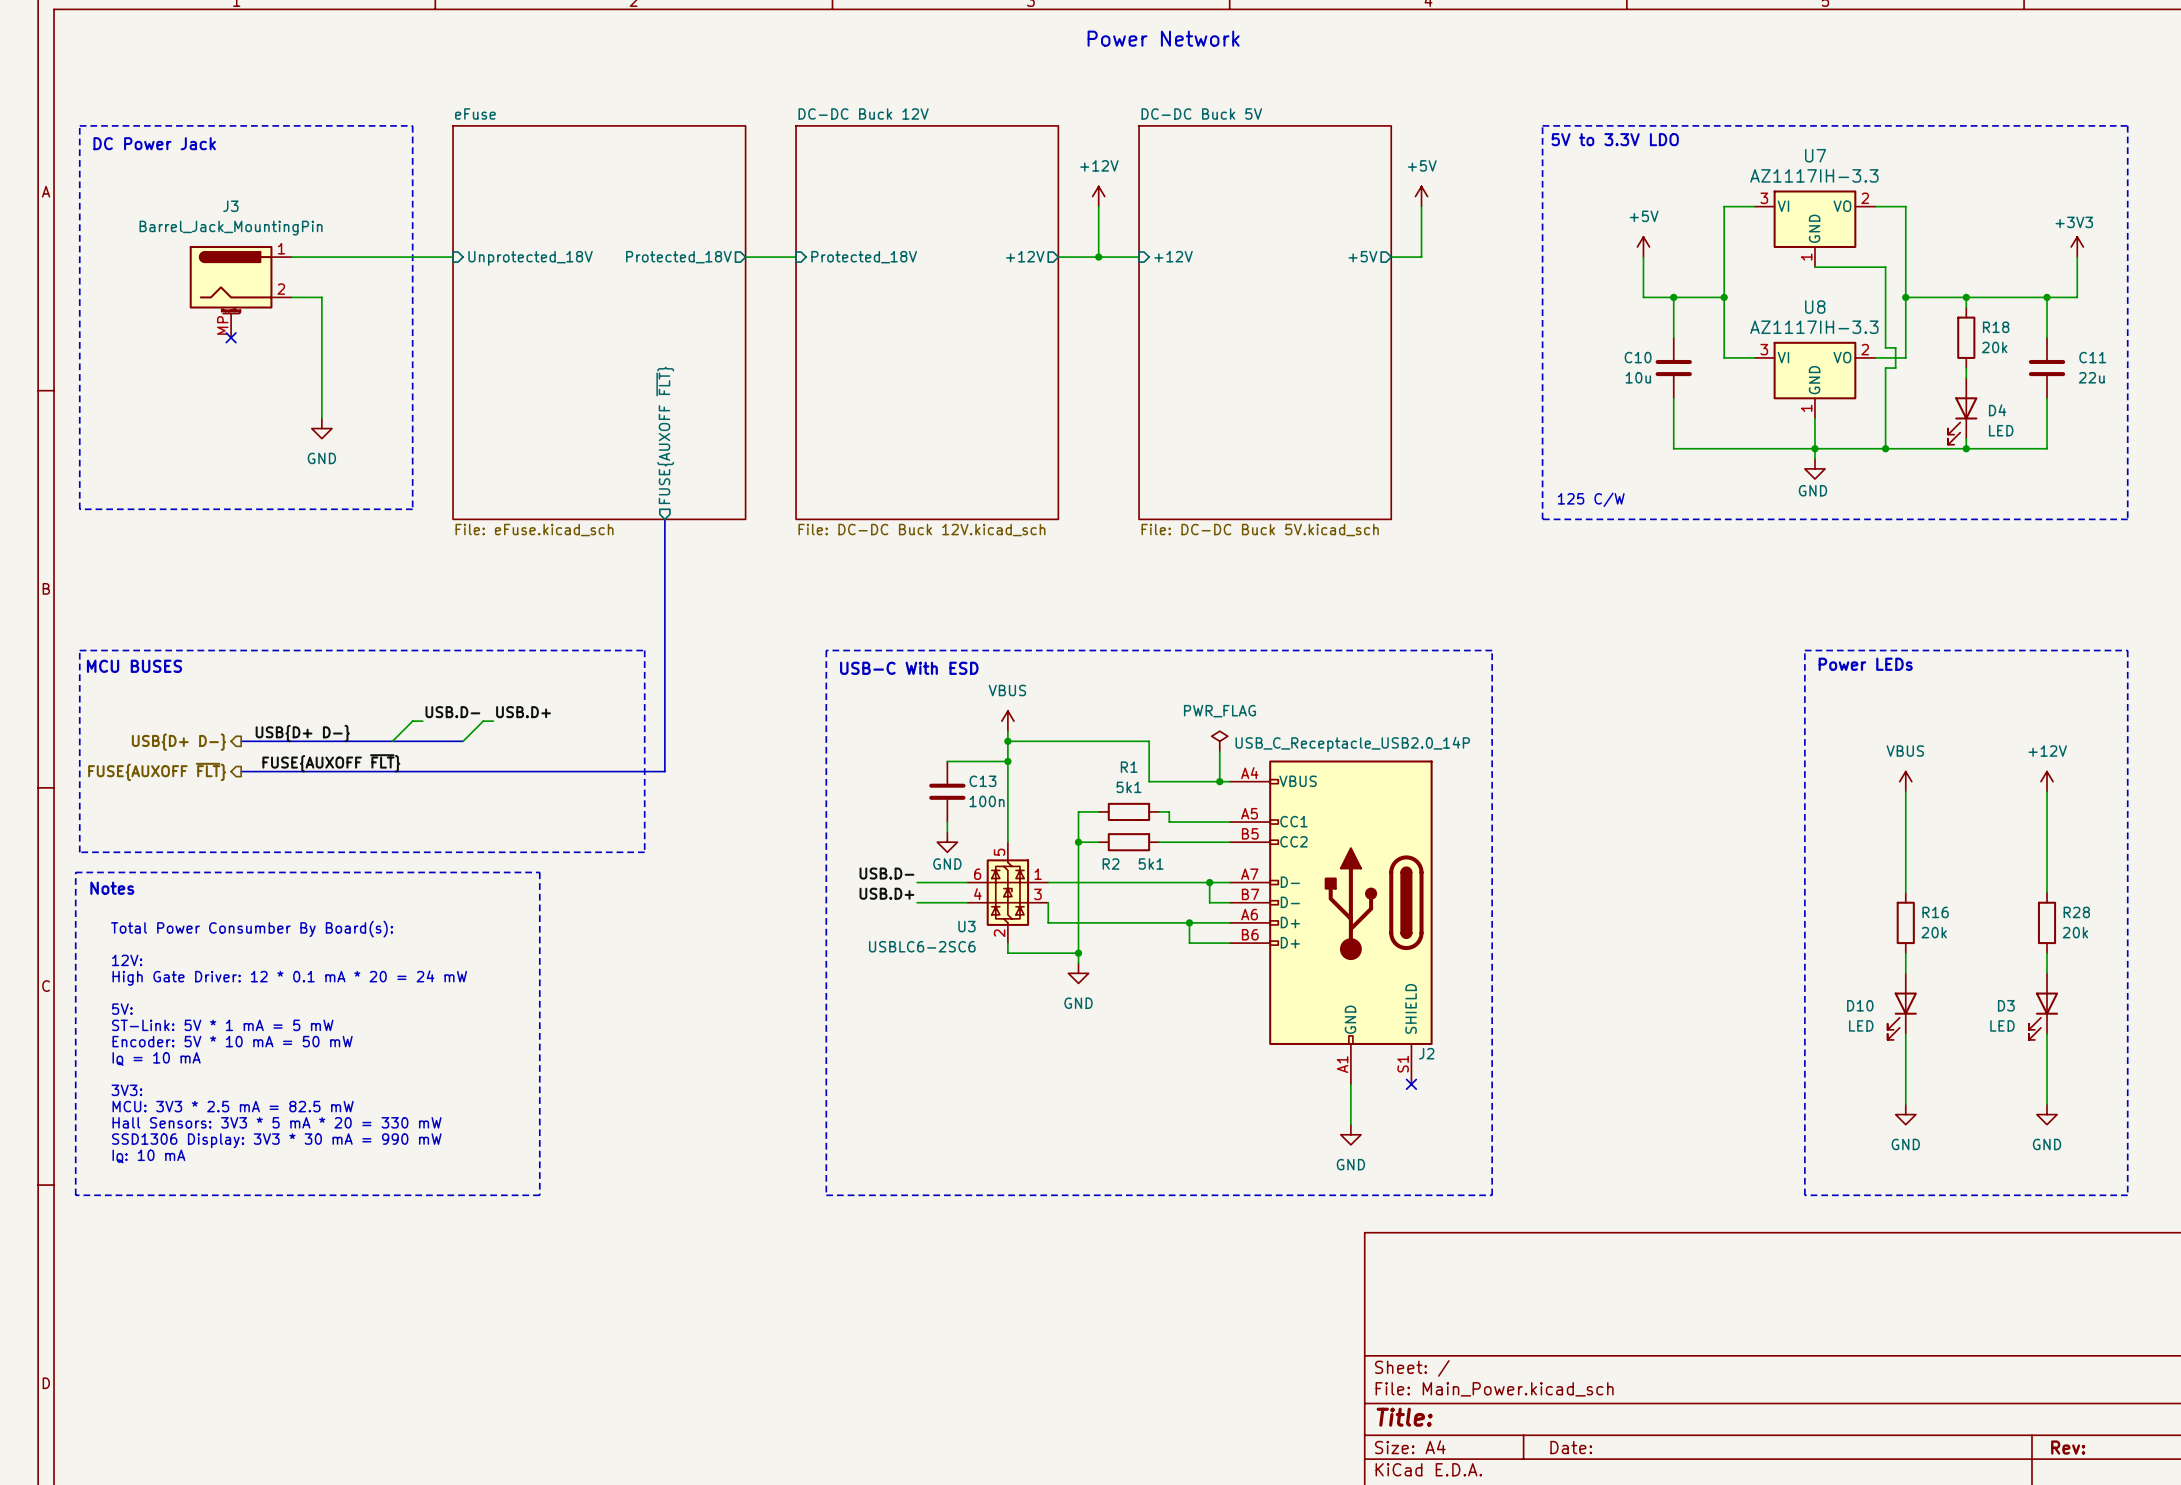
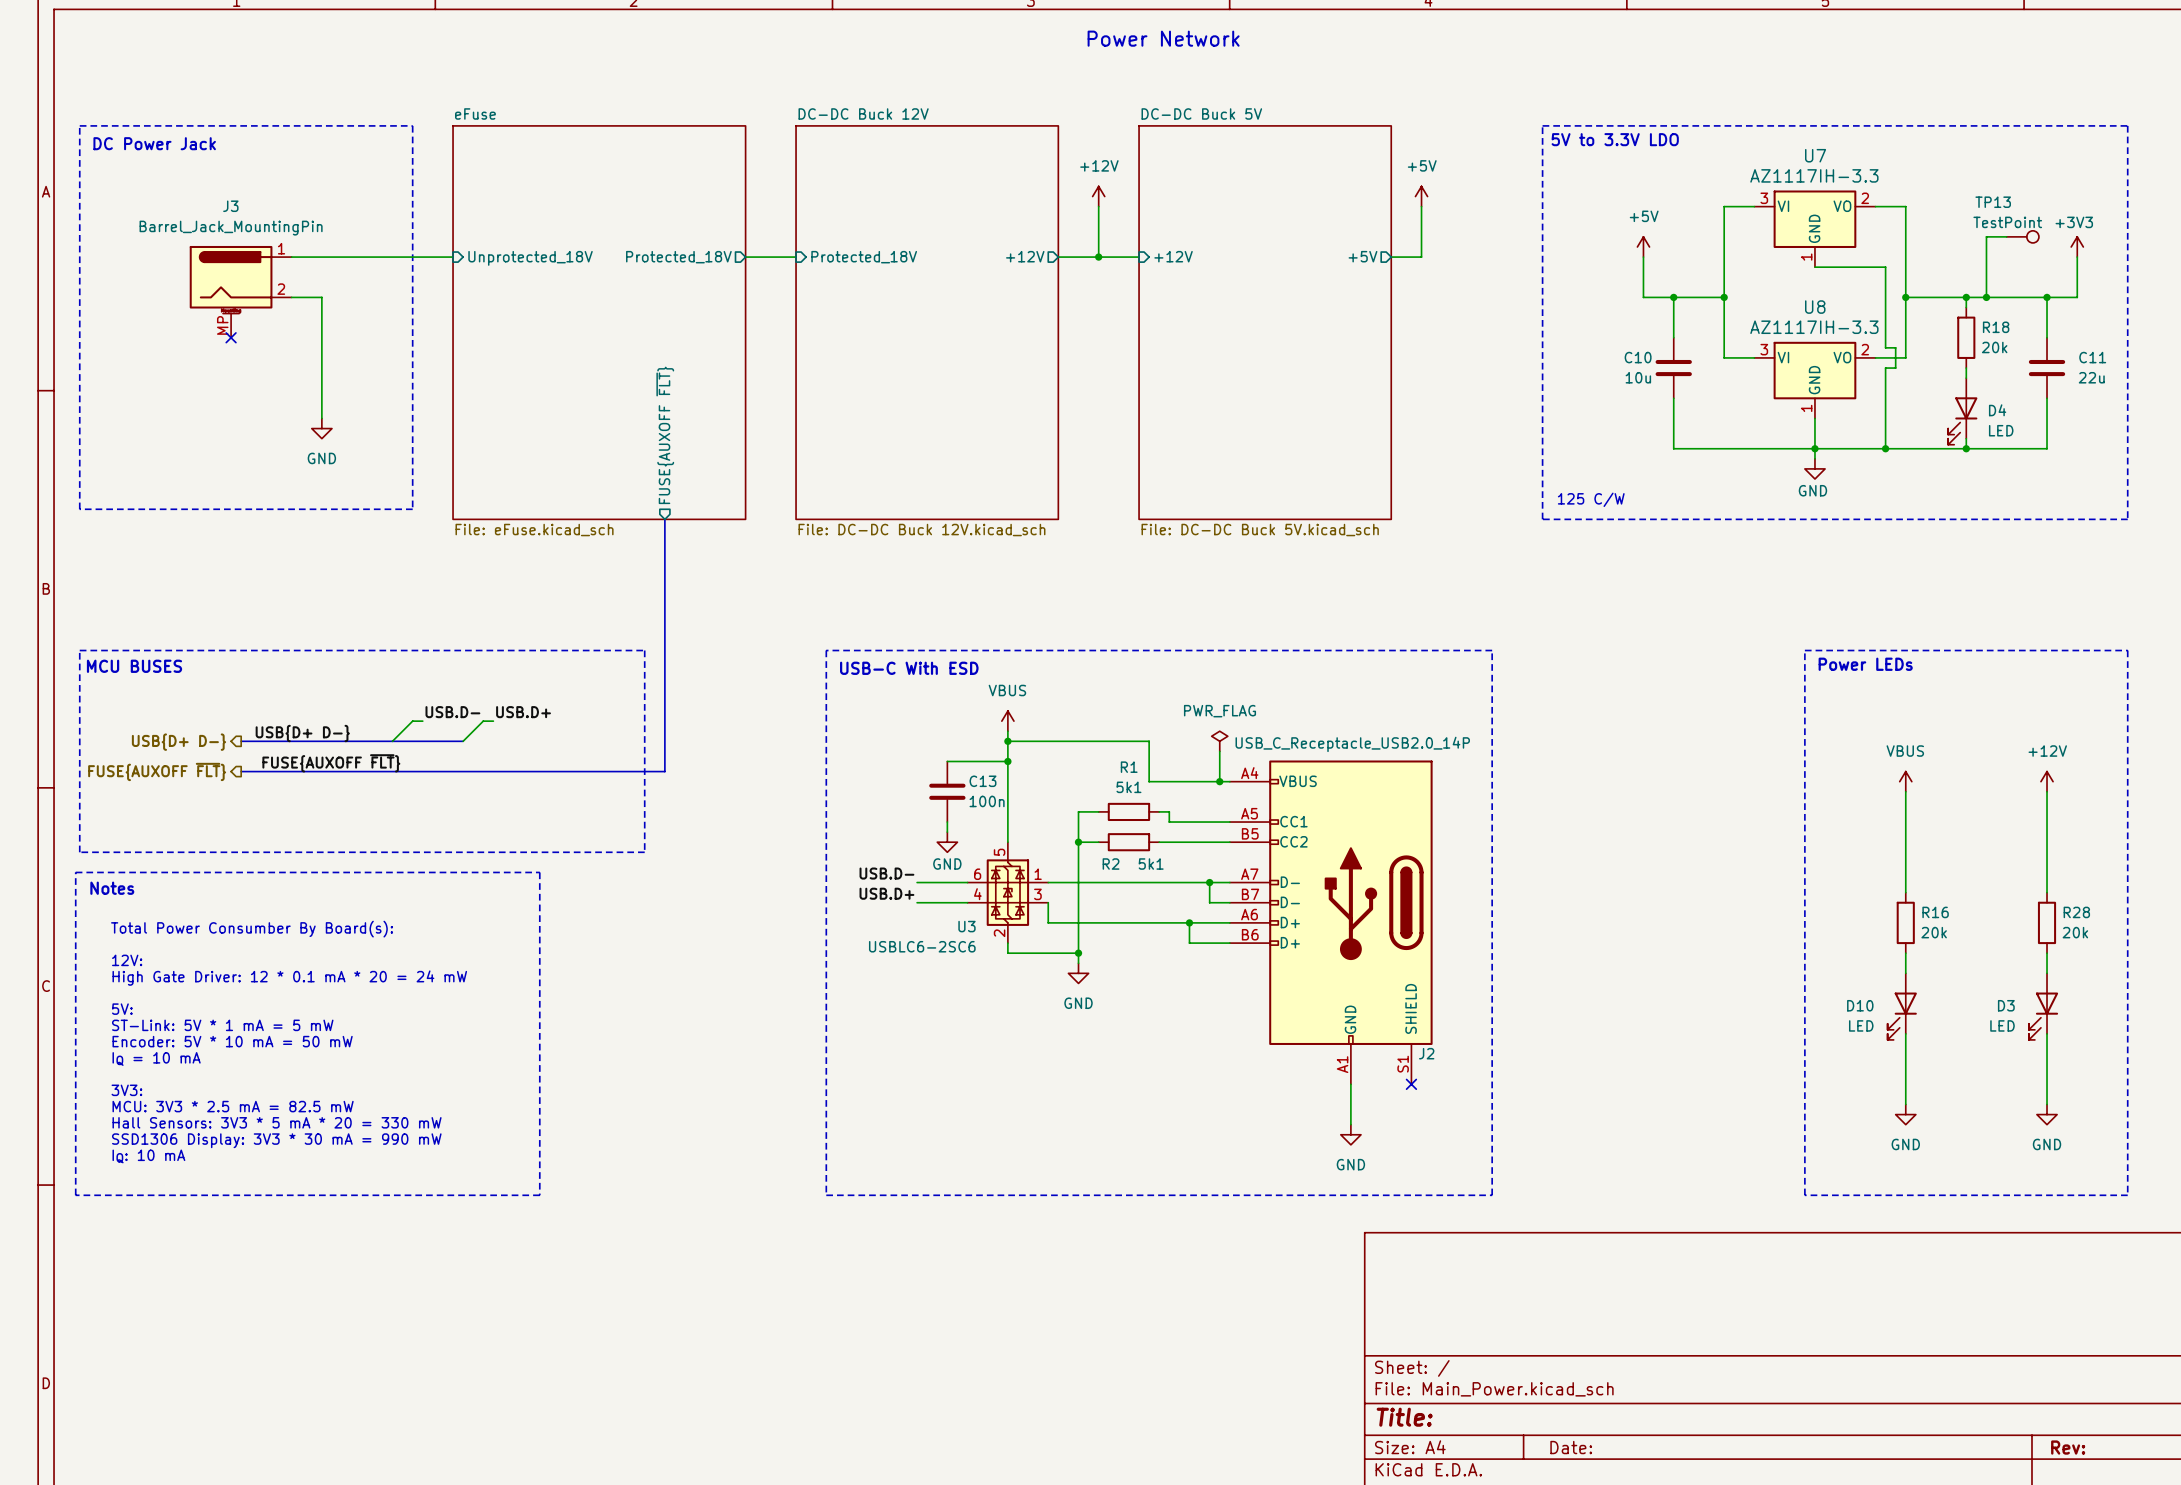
wire: none -> (2006, 236) (1986, 236) (1986, 297)
TP13: none -> TestPoint (2022, 236)
junction: none -> (1986, 297)

